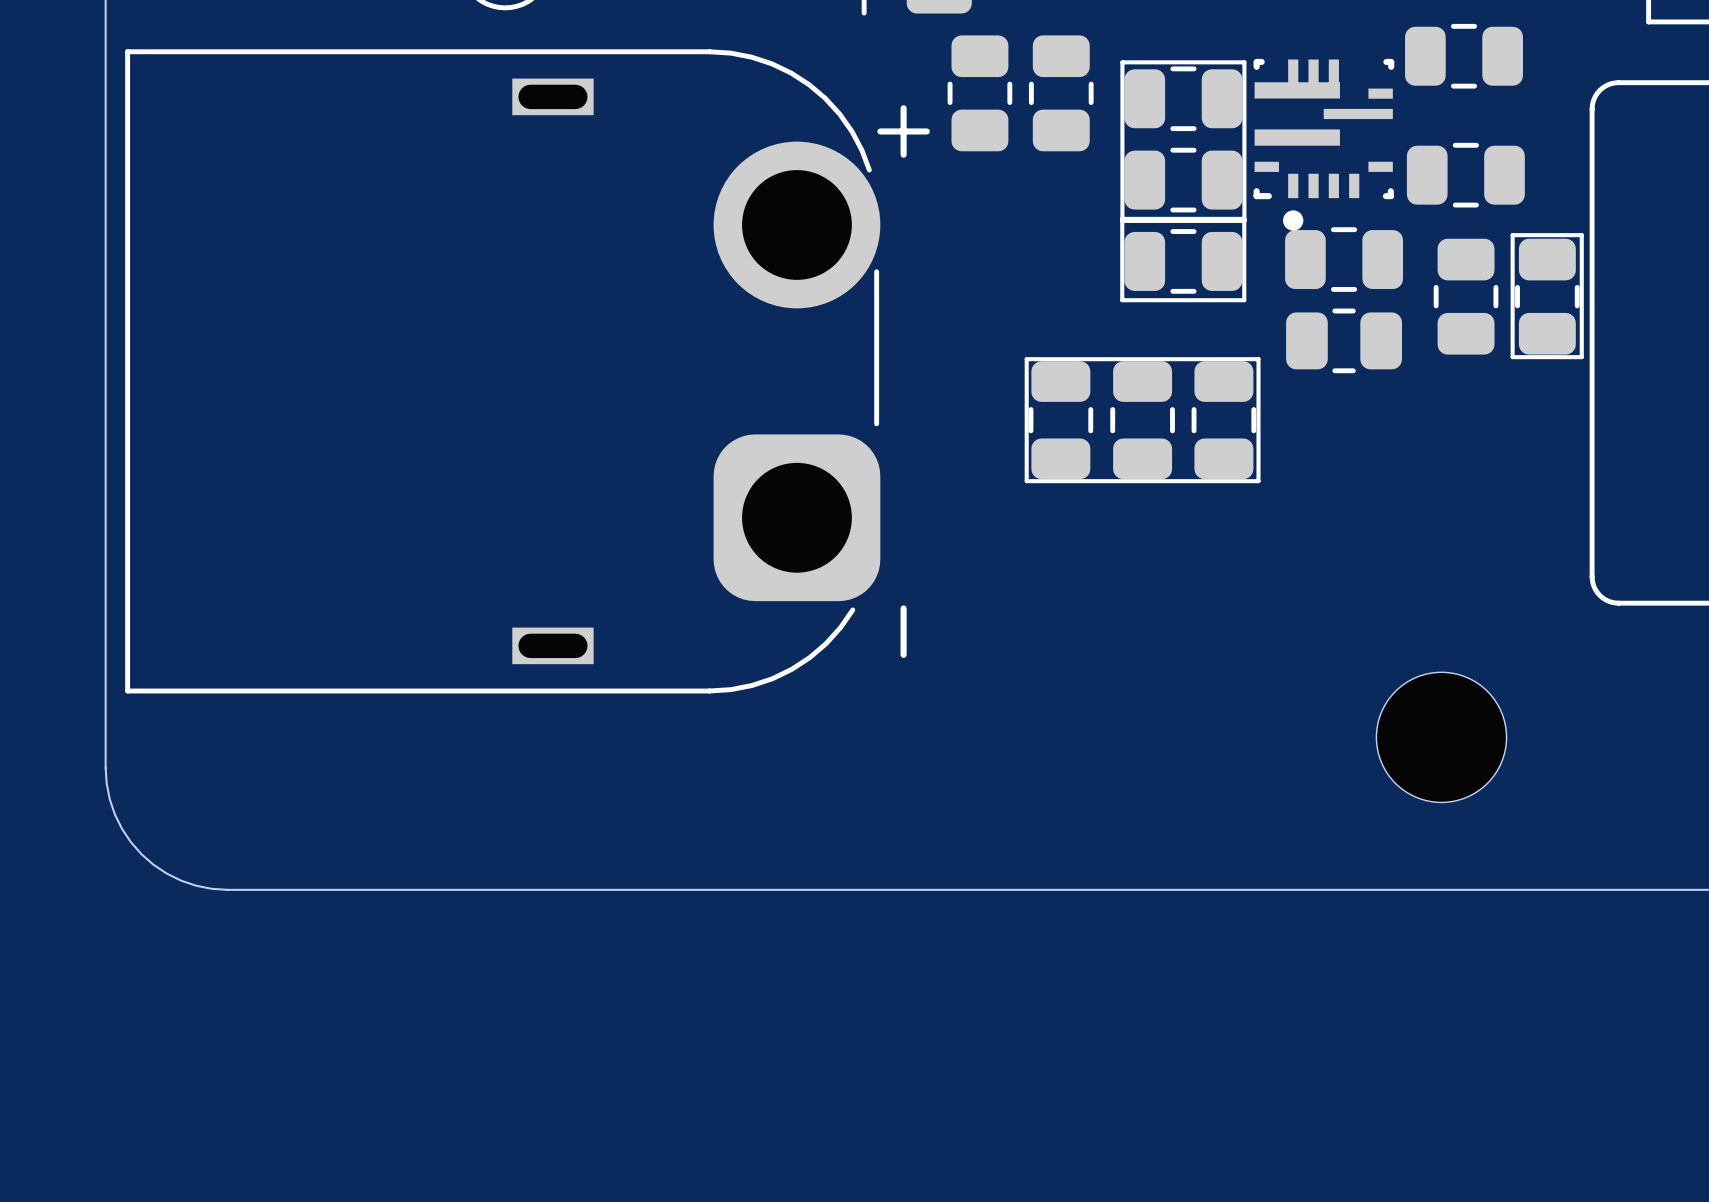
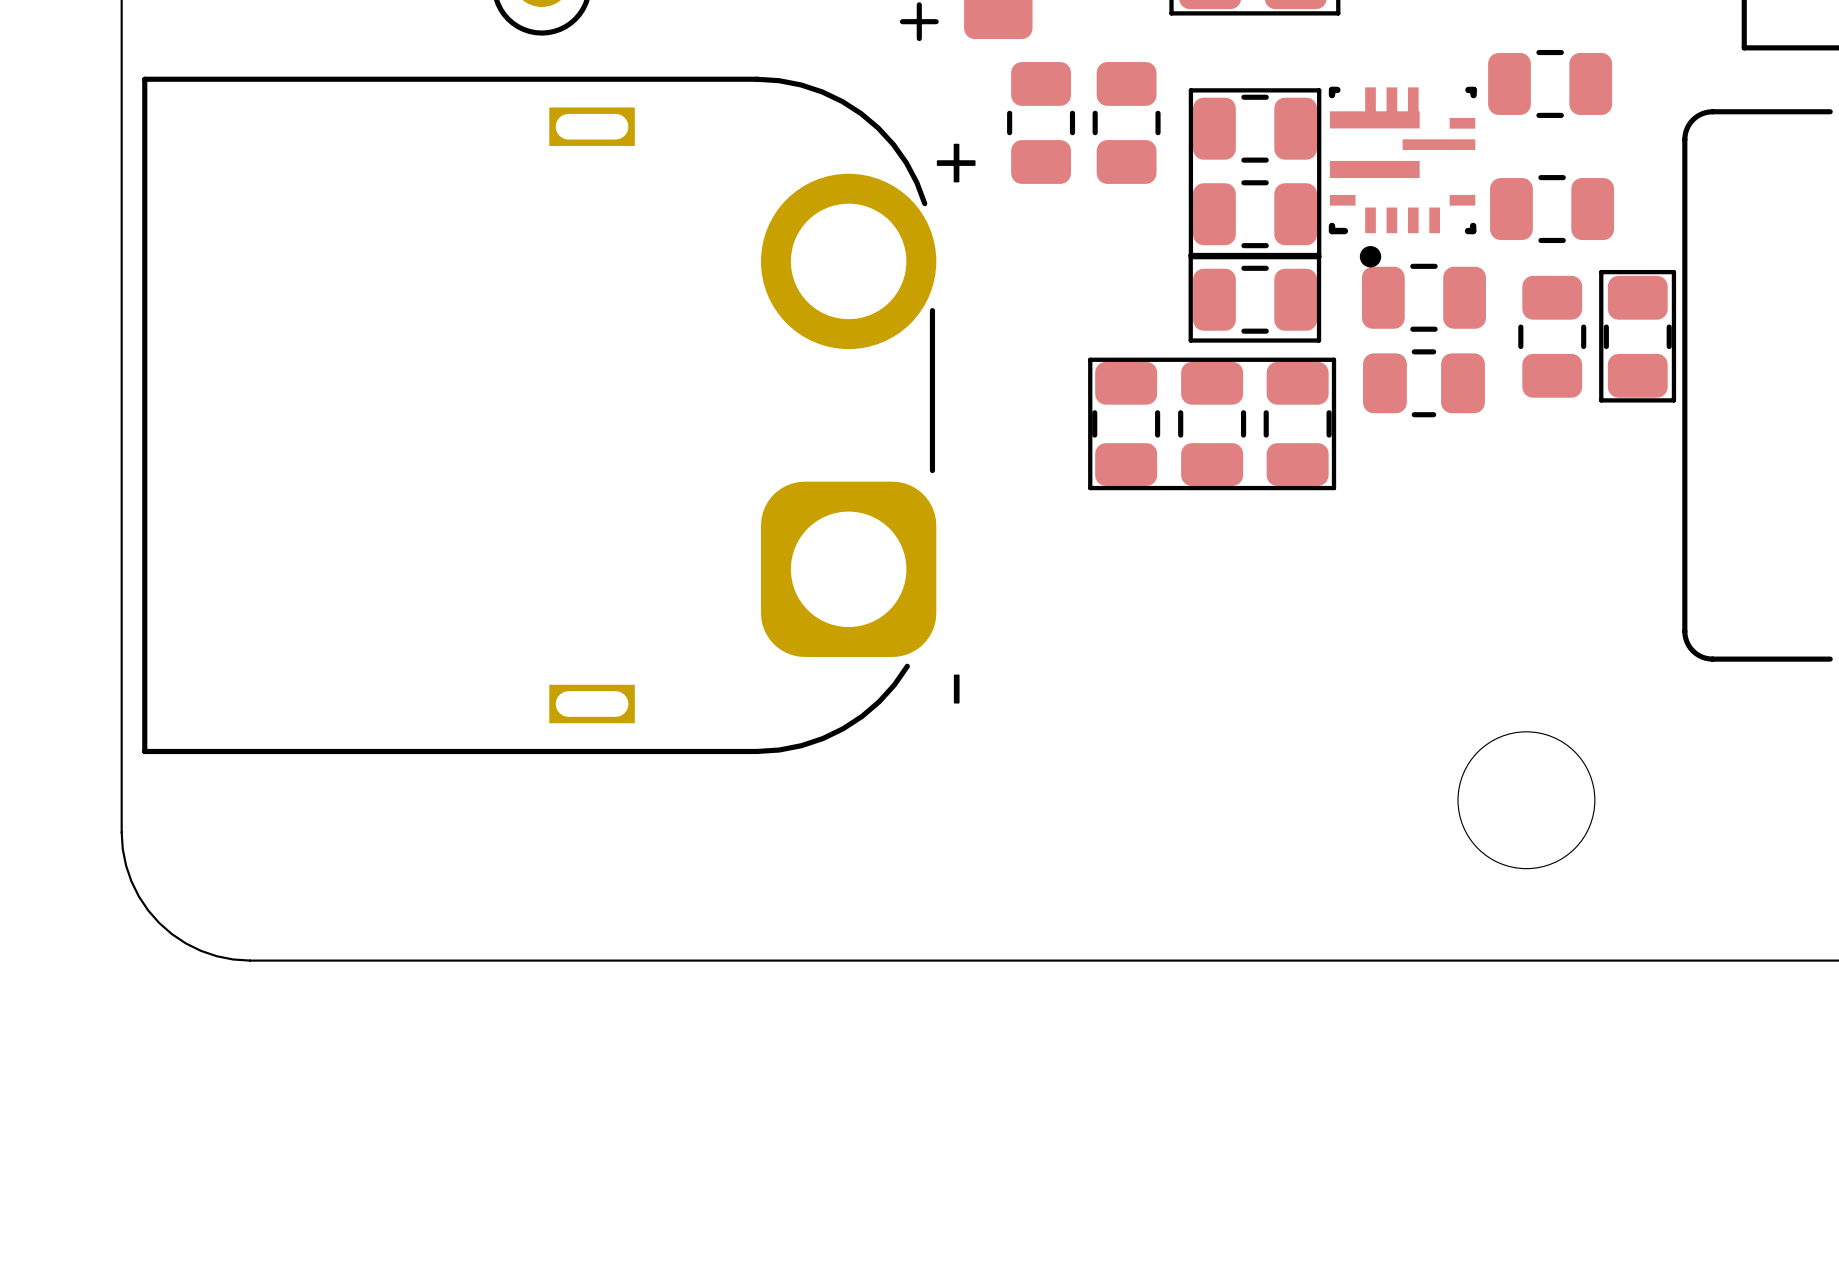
line: (1026, 359) (1258, 359) -> (1090, 402) (1090, 359) (1333, 359) (1333, 402)
part position: (1060, 420) -> (1126, 423)
part position: (1142, 420) -> (1212, 423)
part position: (1223, 420) -> (1297, 423)
line: (1026, 440) (1026, 481) (1258, 481) (1258, 440) -> (1090, 488) (1333, 488)

